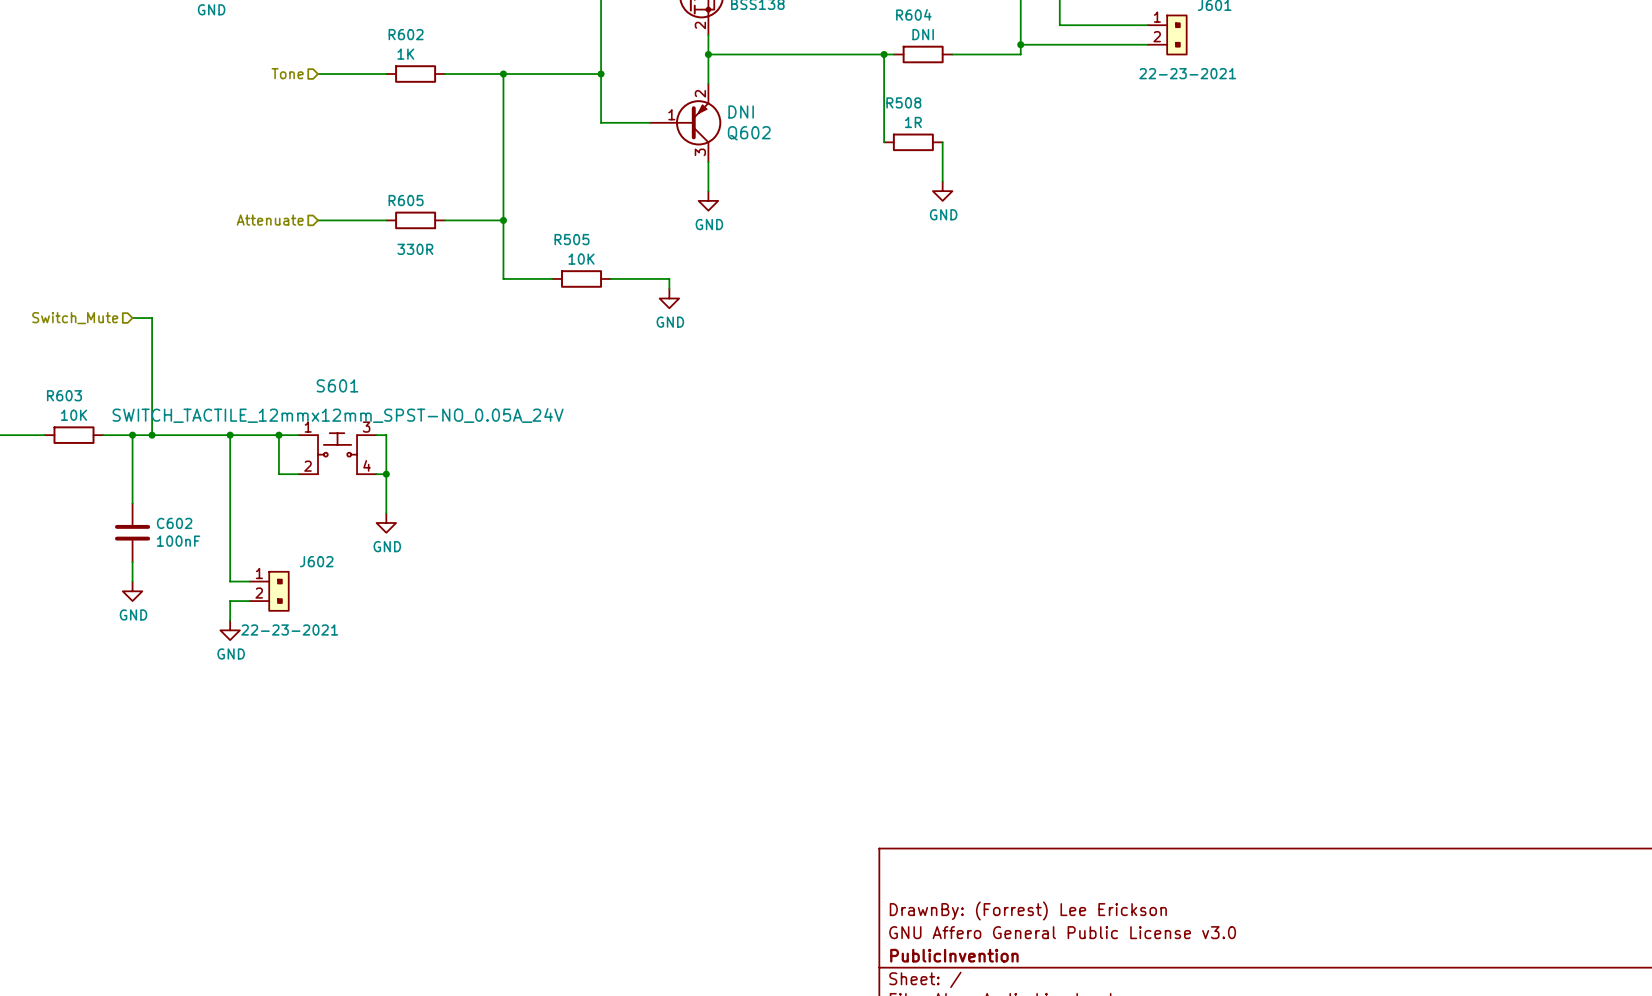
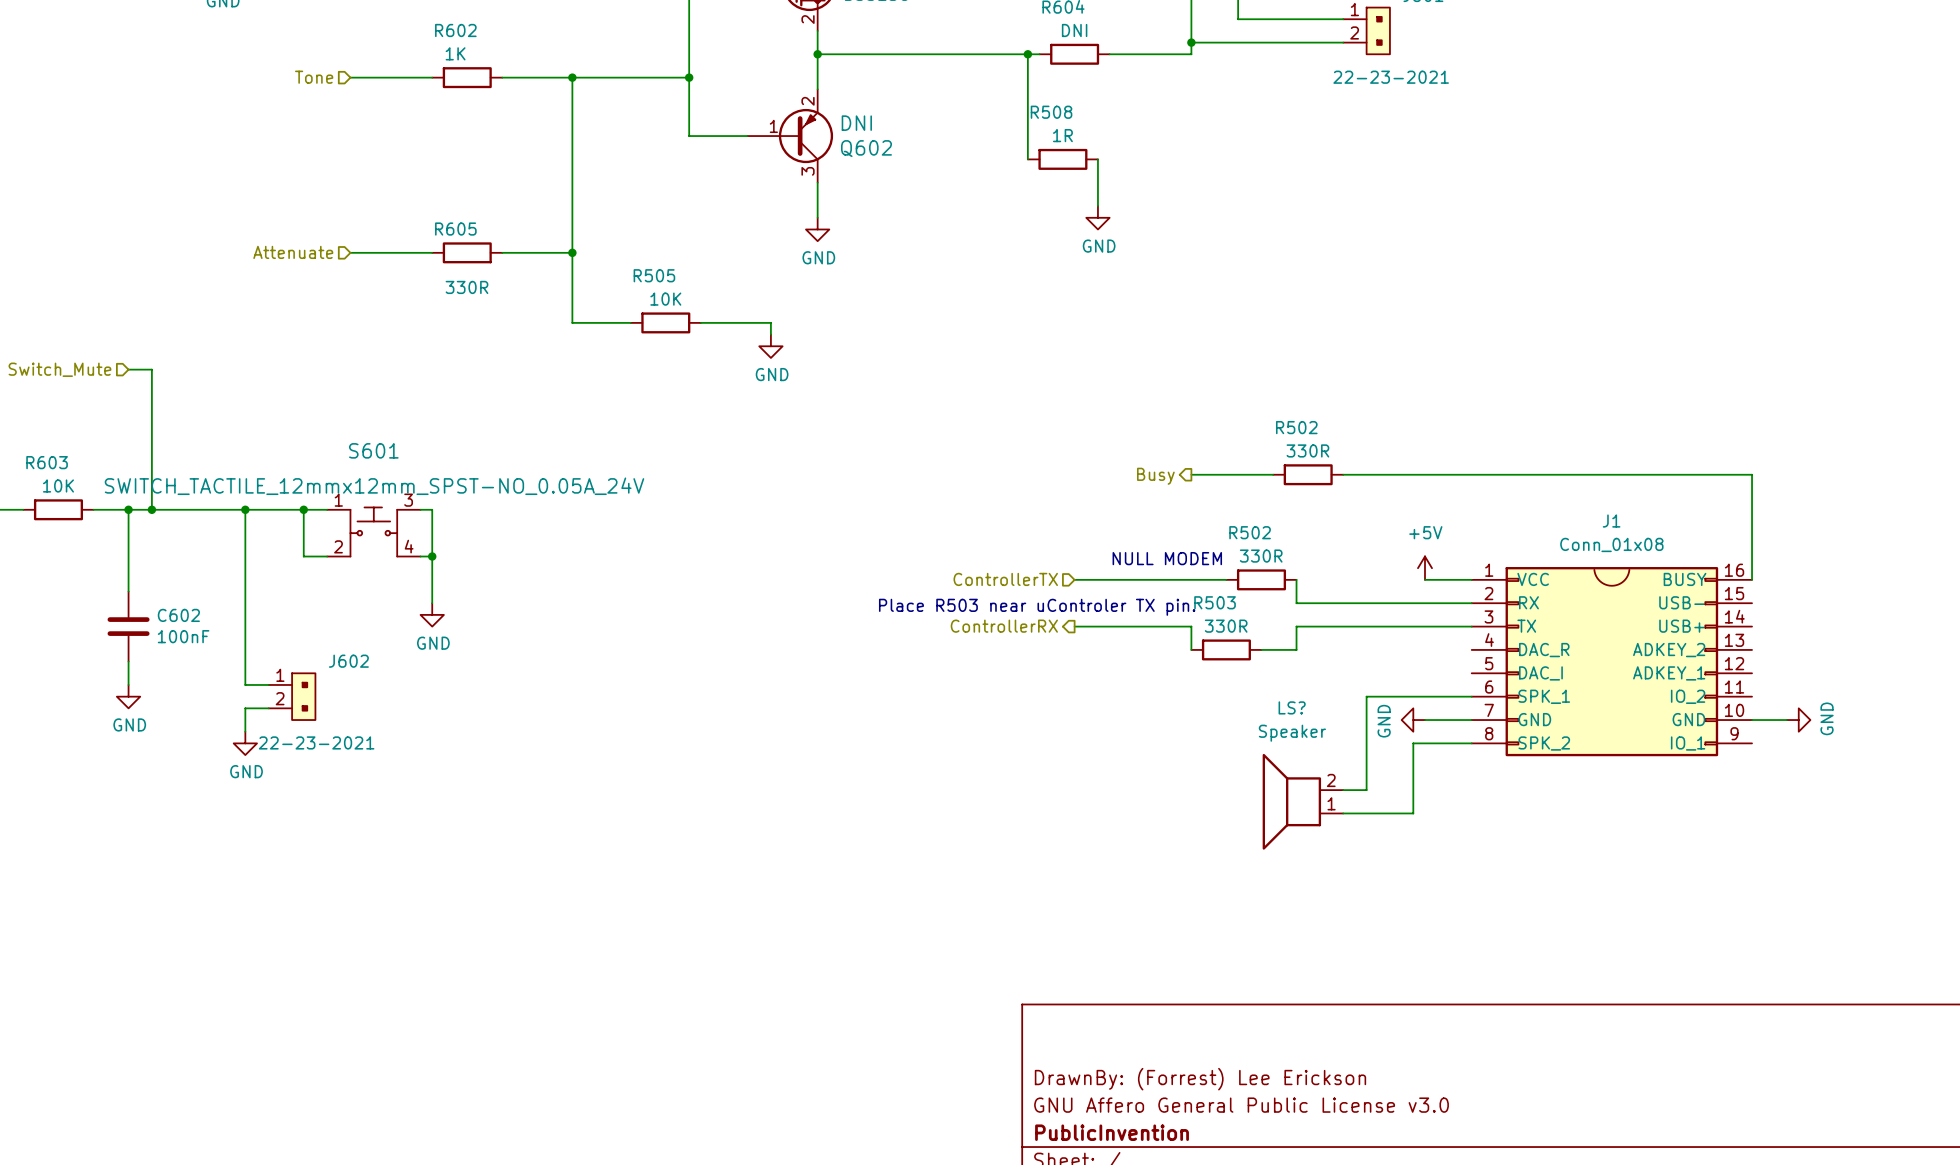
wire: none -> (1191, 474) (1273, 474)
R502: none -> 330R (1308, 474)
wire: none -> (1343, 474) (1752, 474) (1752, 579)
hierarchical label: none -> Busy (1155, 476)
text: none -> NULL MODEM (1167, 558)
power symbol: none -> +5V (1424, 568)
hierarchical label: none -> ControllerTX (1005, 579)
wire: none -> (1074, 579) (1226, 579)
R502: none -> 330R (1261, 579)
wire: none -> (1296, 579) (1296, 603) (1471, 603)
wire: none -> (1424, 579) (1471, 579)
text: none -> Place R503 near uControler TX pin. (1037, 607)
hierarchical label: none -> ControllerRX (1004, 626)
wire: none -> (1074, 626) (1191, 626) (1191, 649)
wire: none -> (1471, 626) (1296, 626) (1296, 649) (1261, 649)
R503: none -> 330R (1226, 649)
J1: none -> Conn_01x08 (1611, 661)
wire: none -> (1471, 696) (1366, 696) (1366, 790) (1343, 790)
power symbol: none -> GND (1413, 720)
wire: none -> (1424, 720) (1471, 720)
wire: none -> (1752, 720) (1787, 720)
power symbol: none -> GND (1798, 720)
wire: none -> (1471, 743) (1413, 743) (1413, 813) (1343, 813)
LS?: none -> Speaker (1302, 801)

